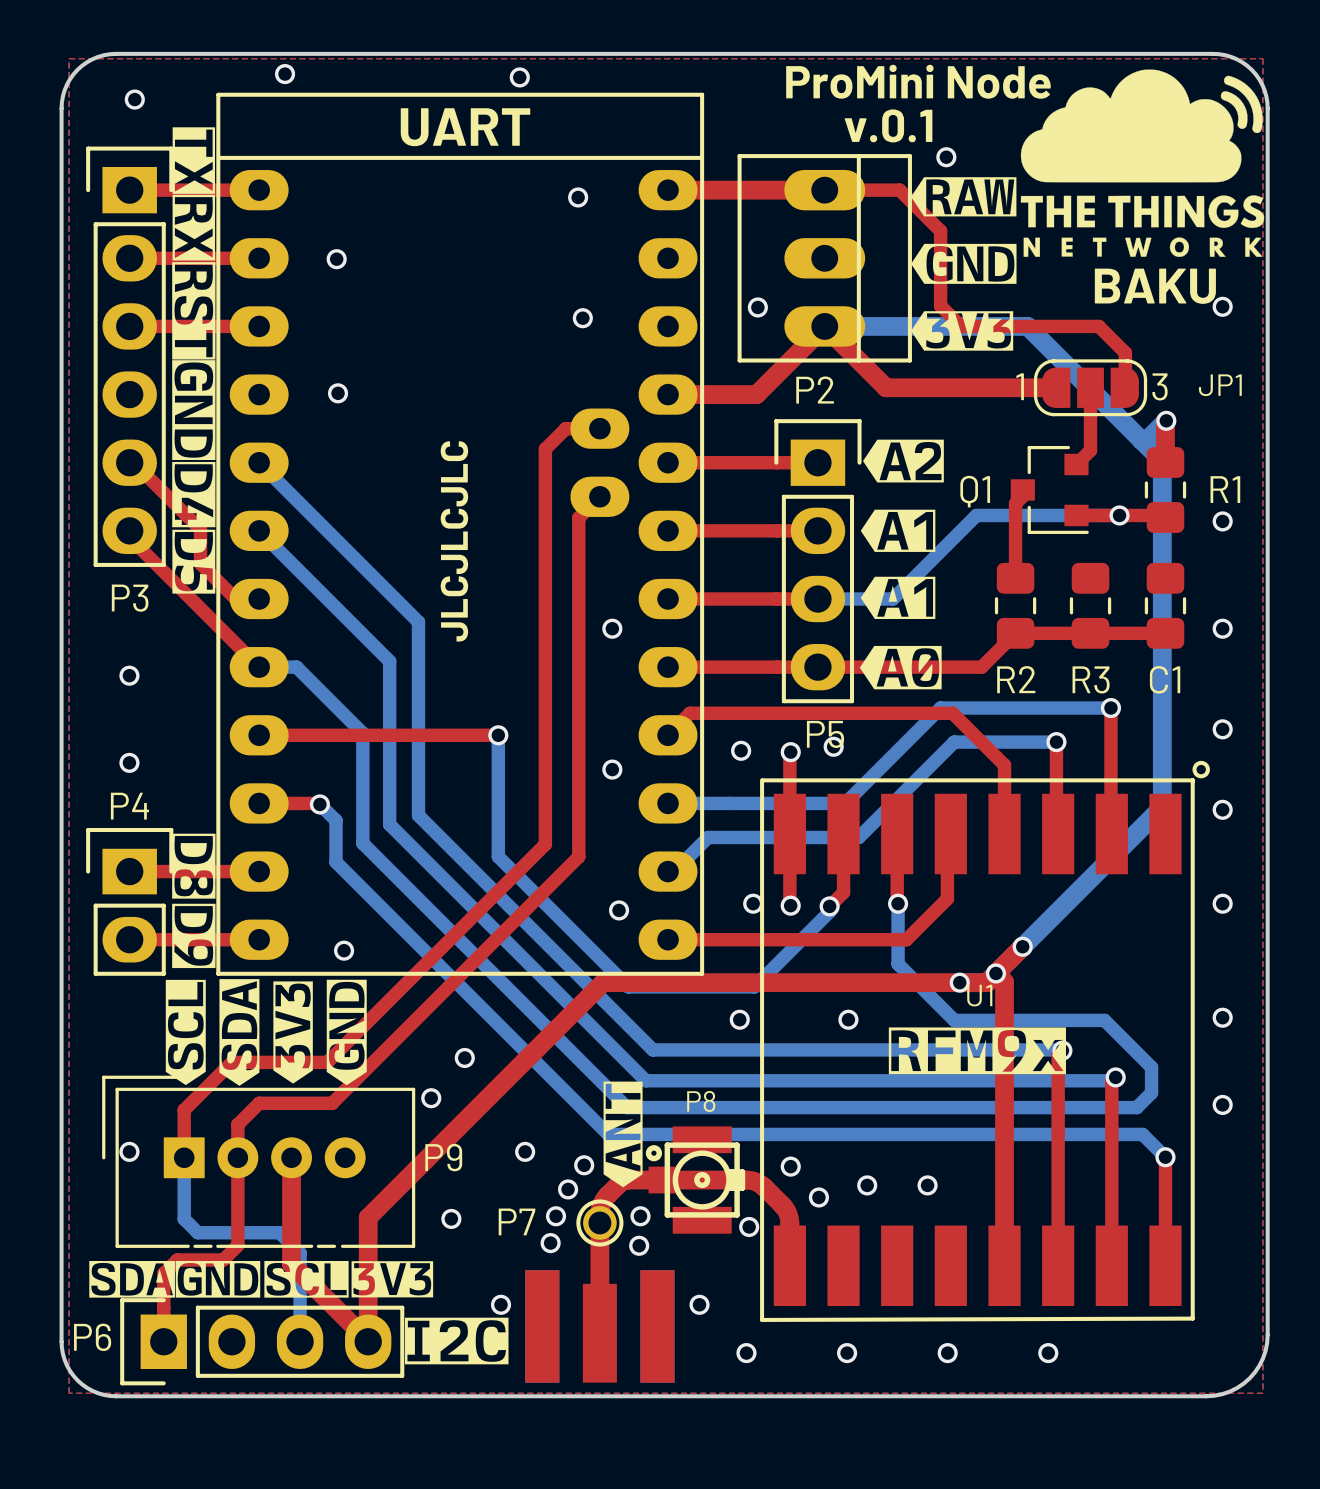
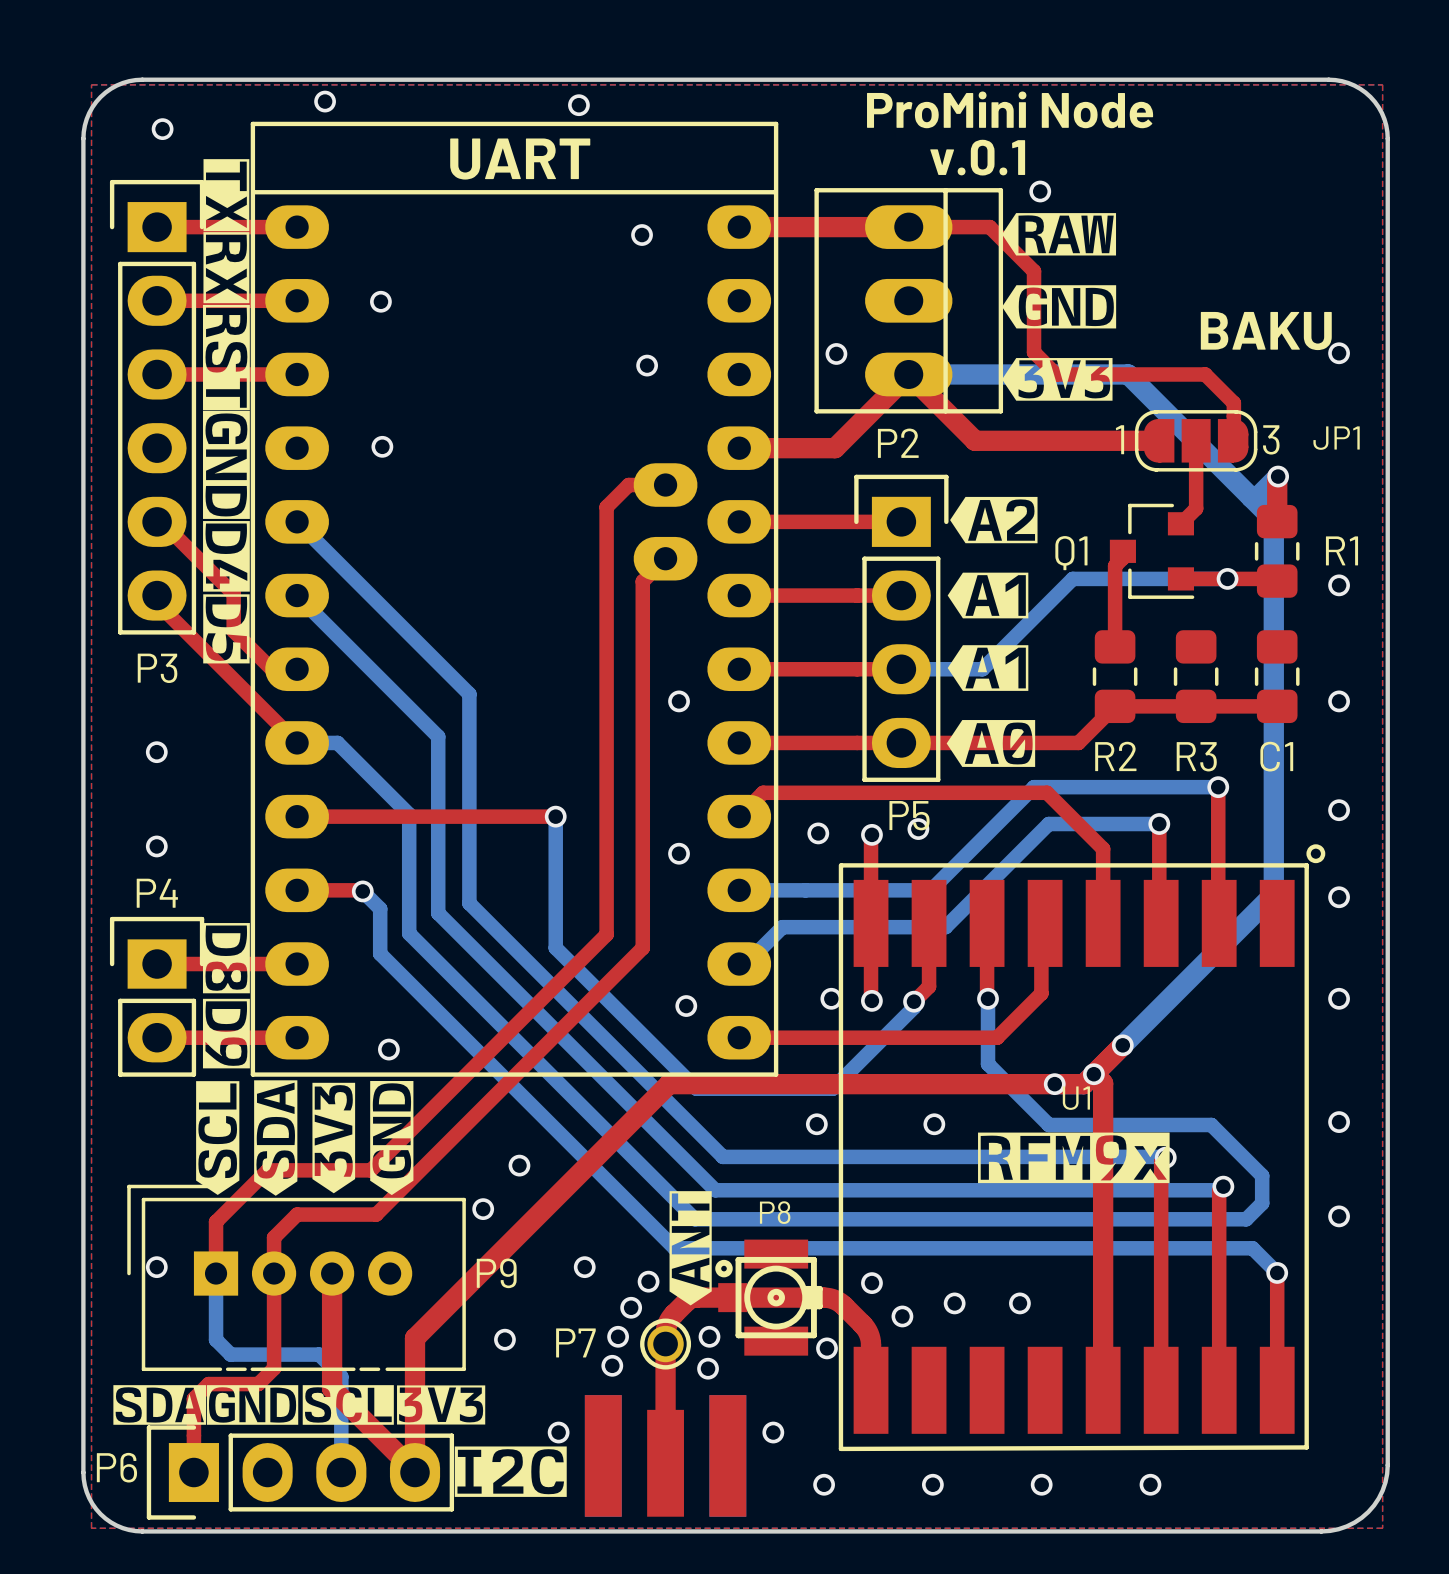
drawing: [1020, 69, 1265, 257] -> none
text: JLCJLCJLC (454, 541) -> none

